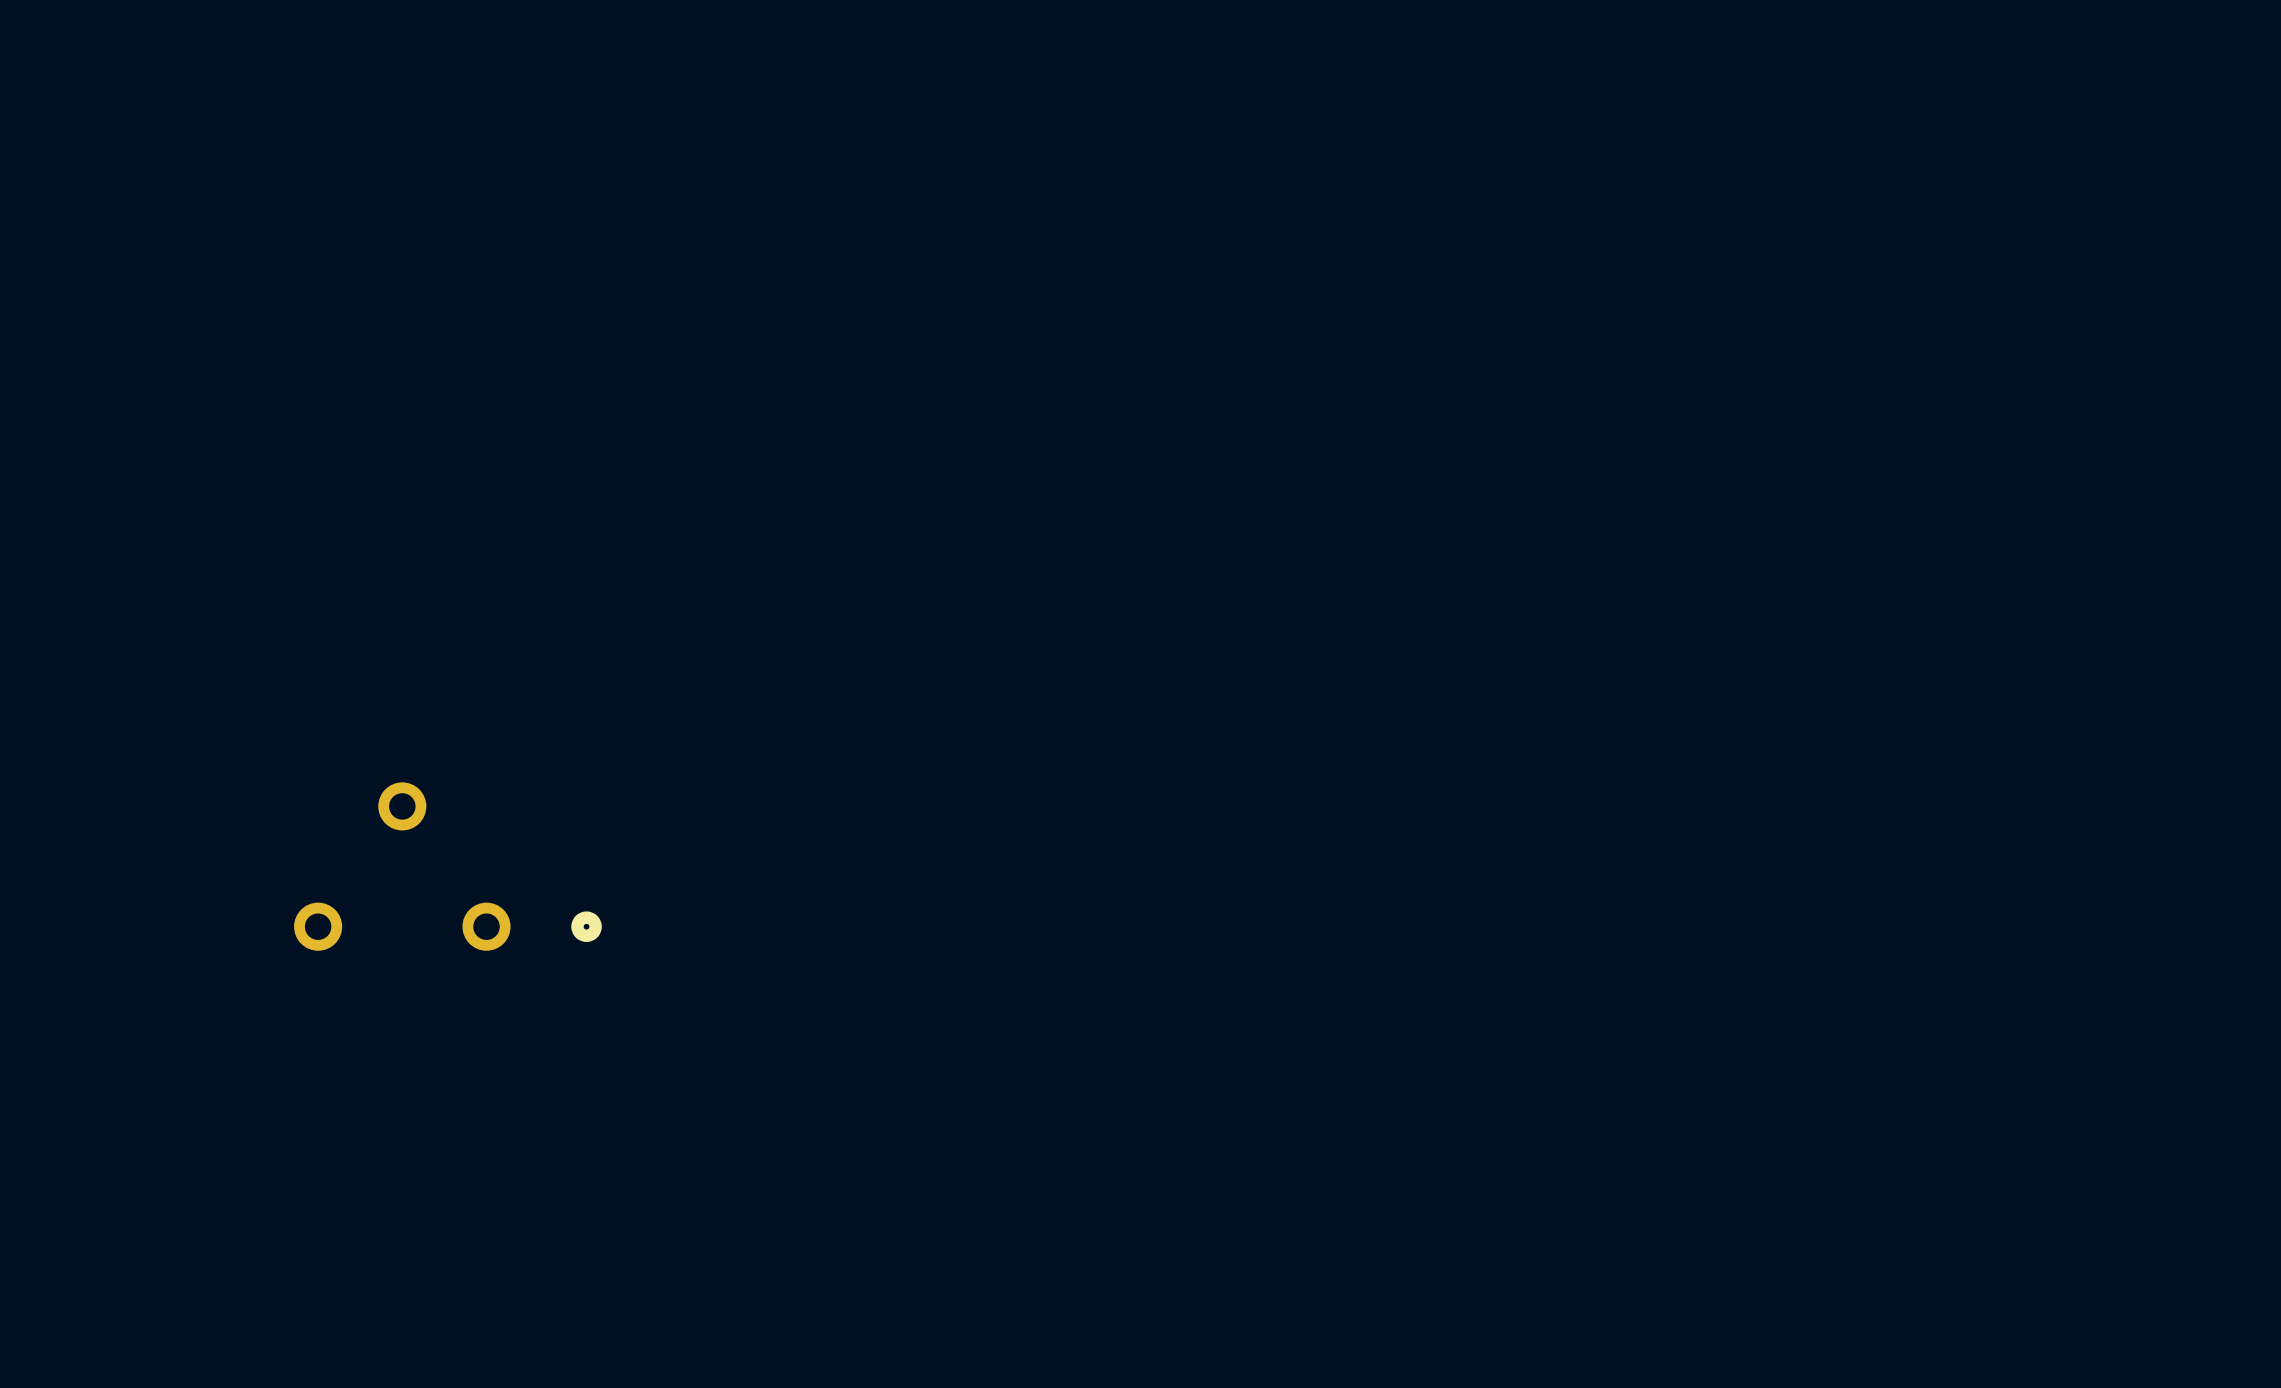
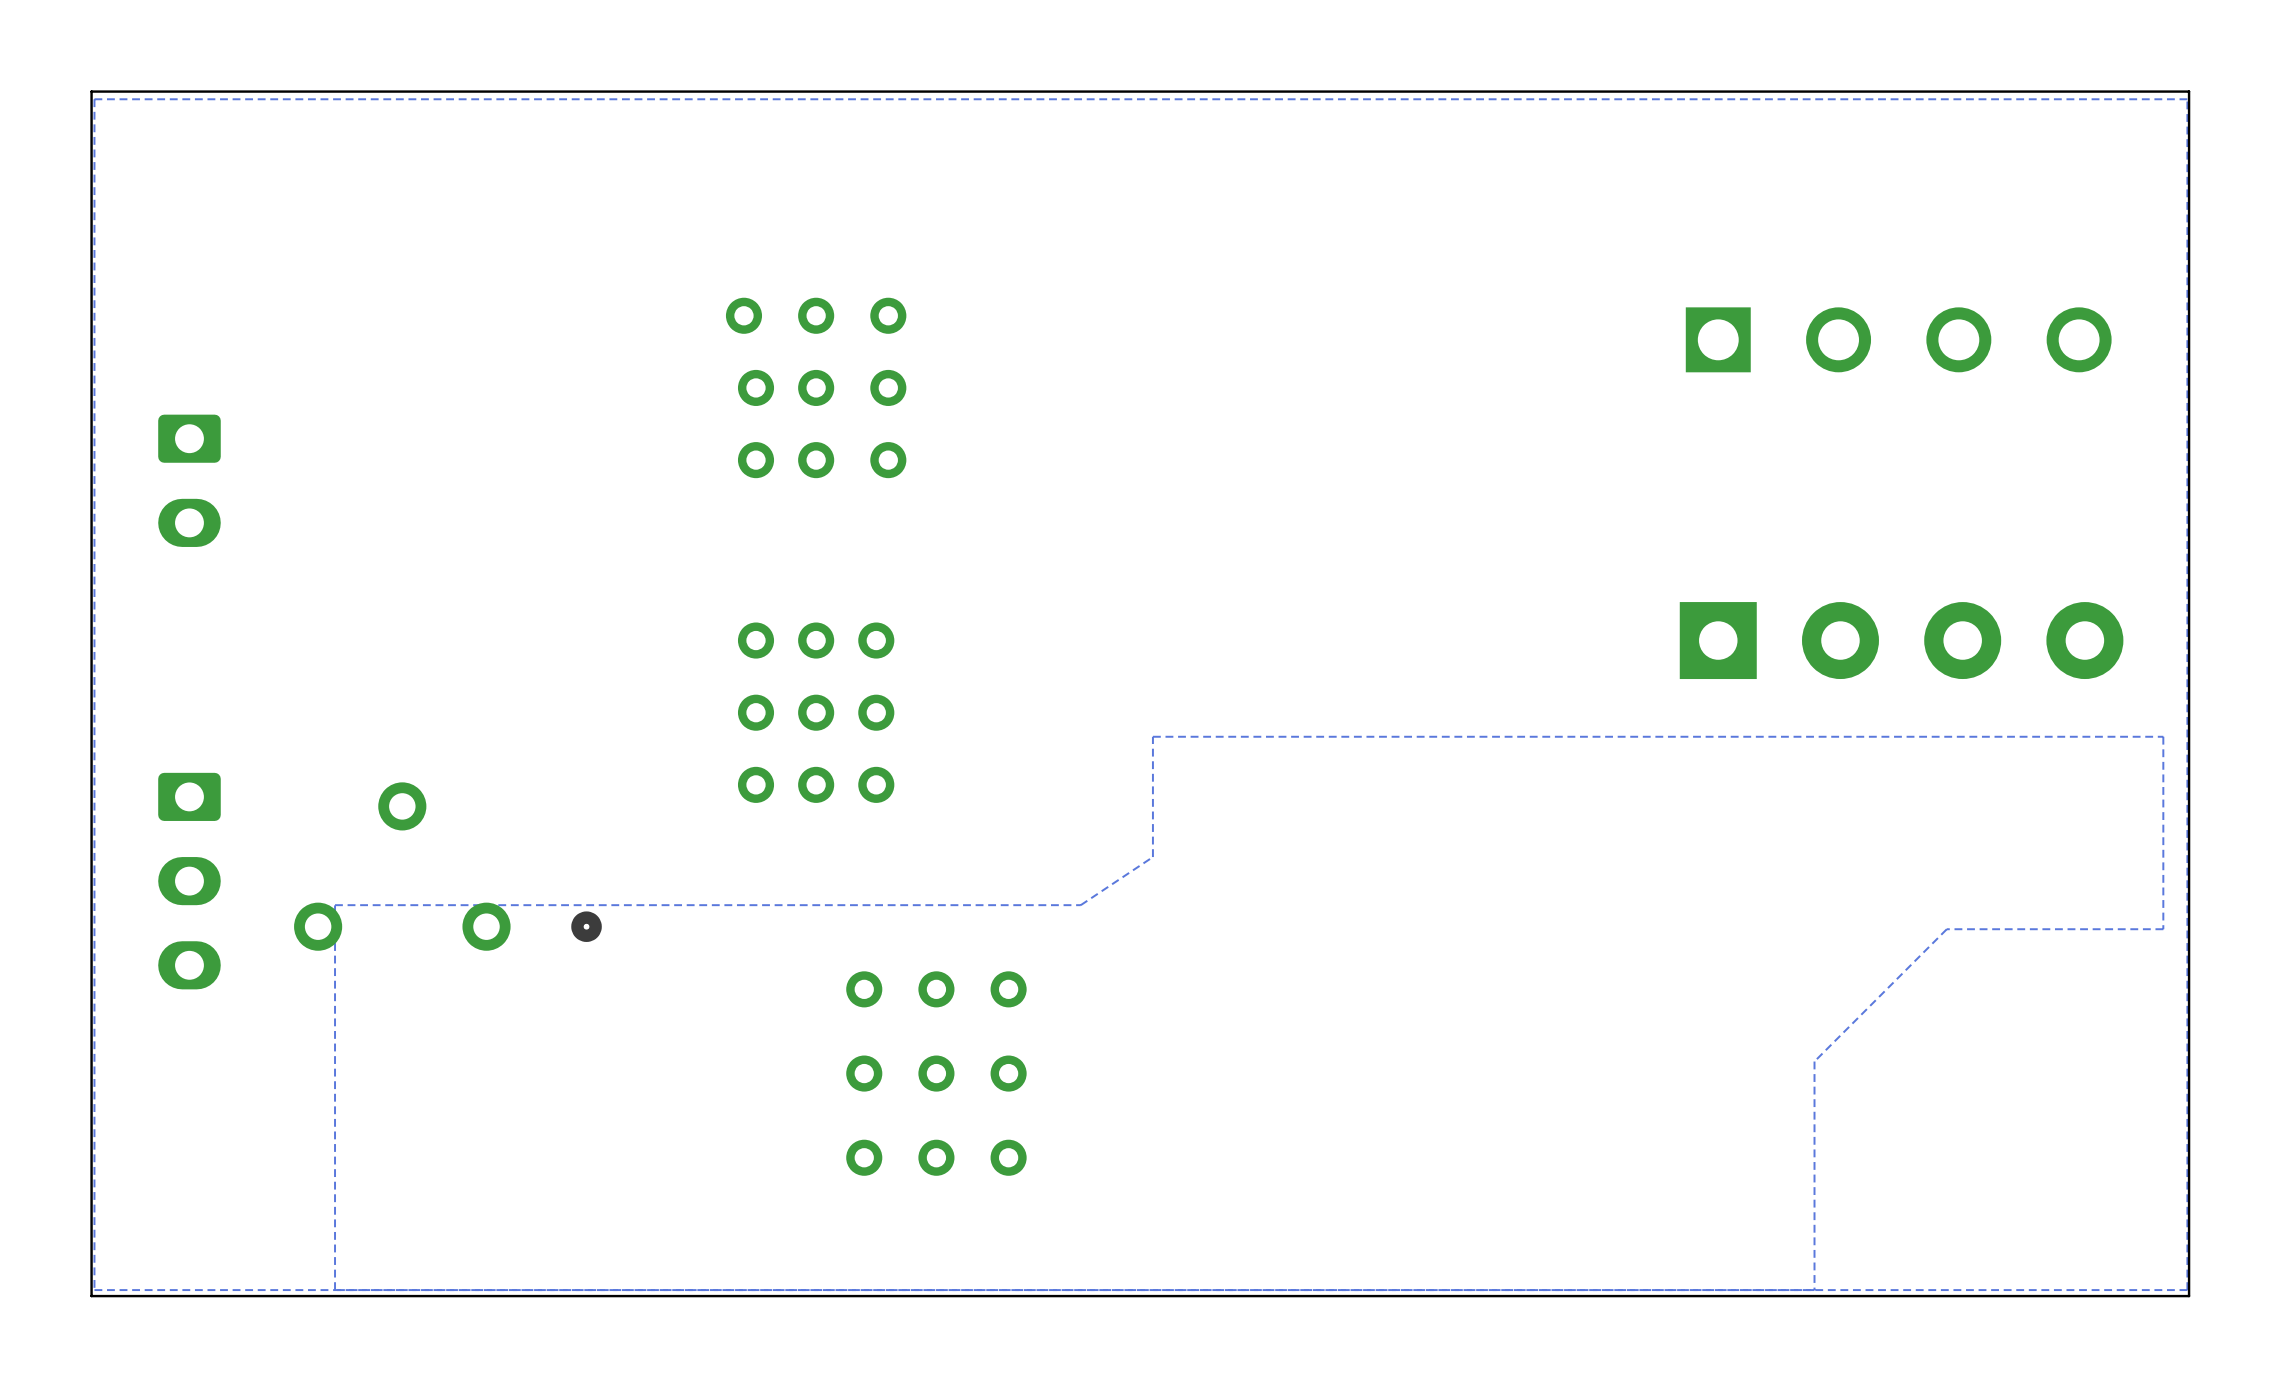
board edge: none -> (2189, 91) (91, 91) (91, 1296) (2189, 1296) (2189, 91)
zone outline: none -> (2187, 99) (94, 99) (94, 1290) (2187, 1290) (2187, 99)
via: none -> (743, 315)
via: none -> (816, 315)
via: none -> (888, 315)
part: none -> (1898, 339)
via: none -> (756, 387)
via: none -> (816, 387)
via: none -> (888, 387)
via: none -> (756, 460)
via: none -> (816, 460)
via: none -> (888, 460)
part: none -> (189, 480)
via: none -> (756, 640)
via: none -> (816, 640)
via: none -> (876, 640)
part: none -> (1901, 640)
via: none -> (756, 712)
via: none -> (816, 712)
via: none -> (876, 712)
via: none -> (756, 784)
via: none -> (816, 784)
via: none -> (876, 784)
part: none -> (189, 881)
via: none -> (864, 989)
via: none -> (936, 989)
via: none -> (1008, 989)
via: none -> (864, 1073)
via: none -> (936, 1073)
via: none -> (1008, 1073)
via: none -> (864, 1157)
via: none -> (936, 1157)
via: none -> (1008, 1157)
zone outline: none -> (1814, 1290) (1814, 1061) (1946, 929) (2163, 929) (2163, 736) (1152, 736) (1152, 857) (1080, 905) (335, 905) (335, 1290)

